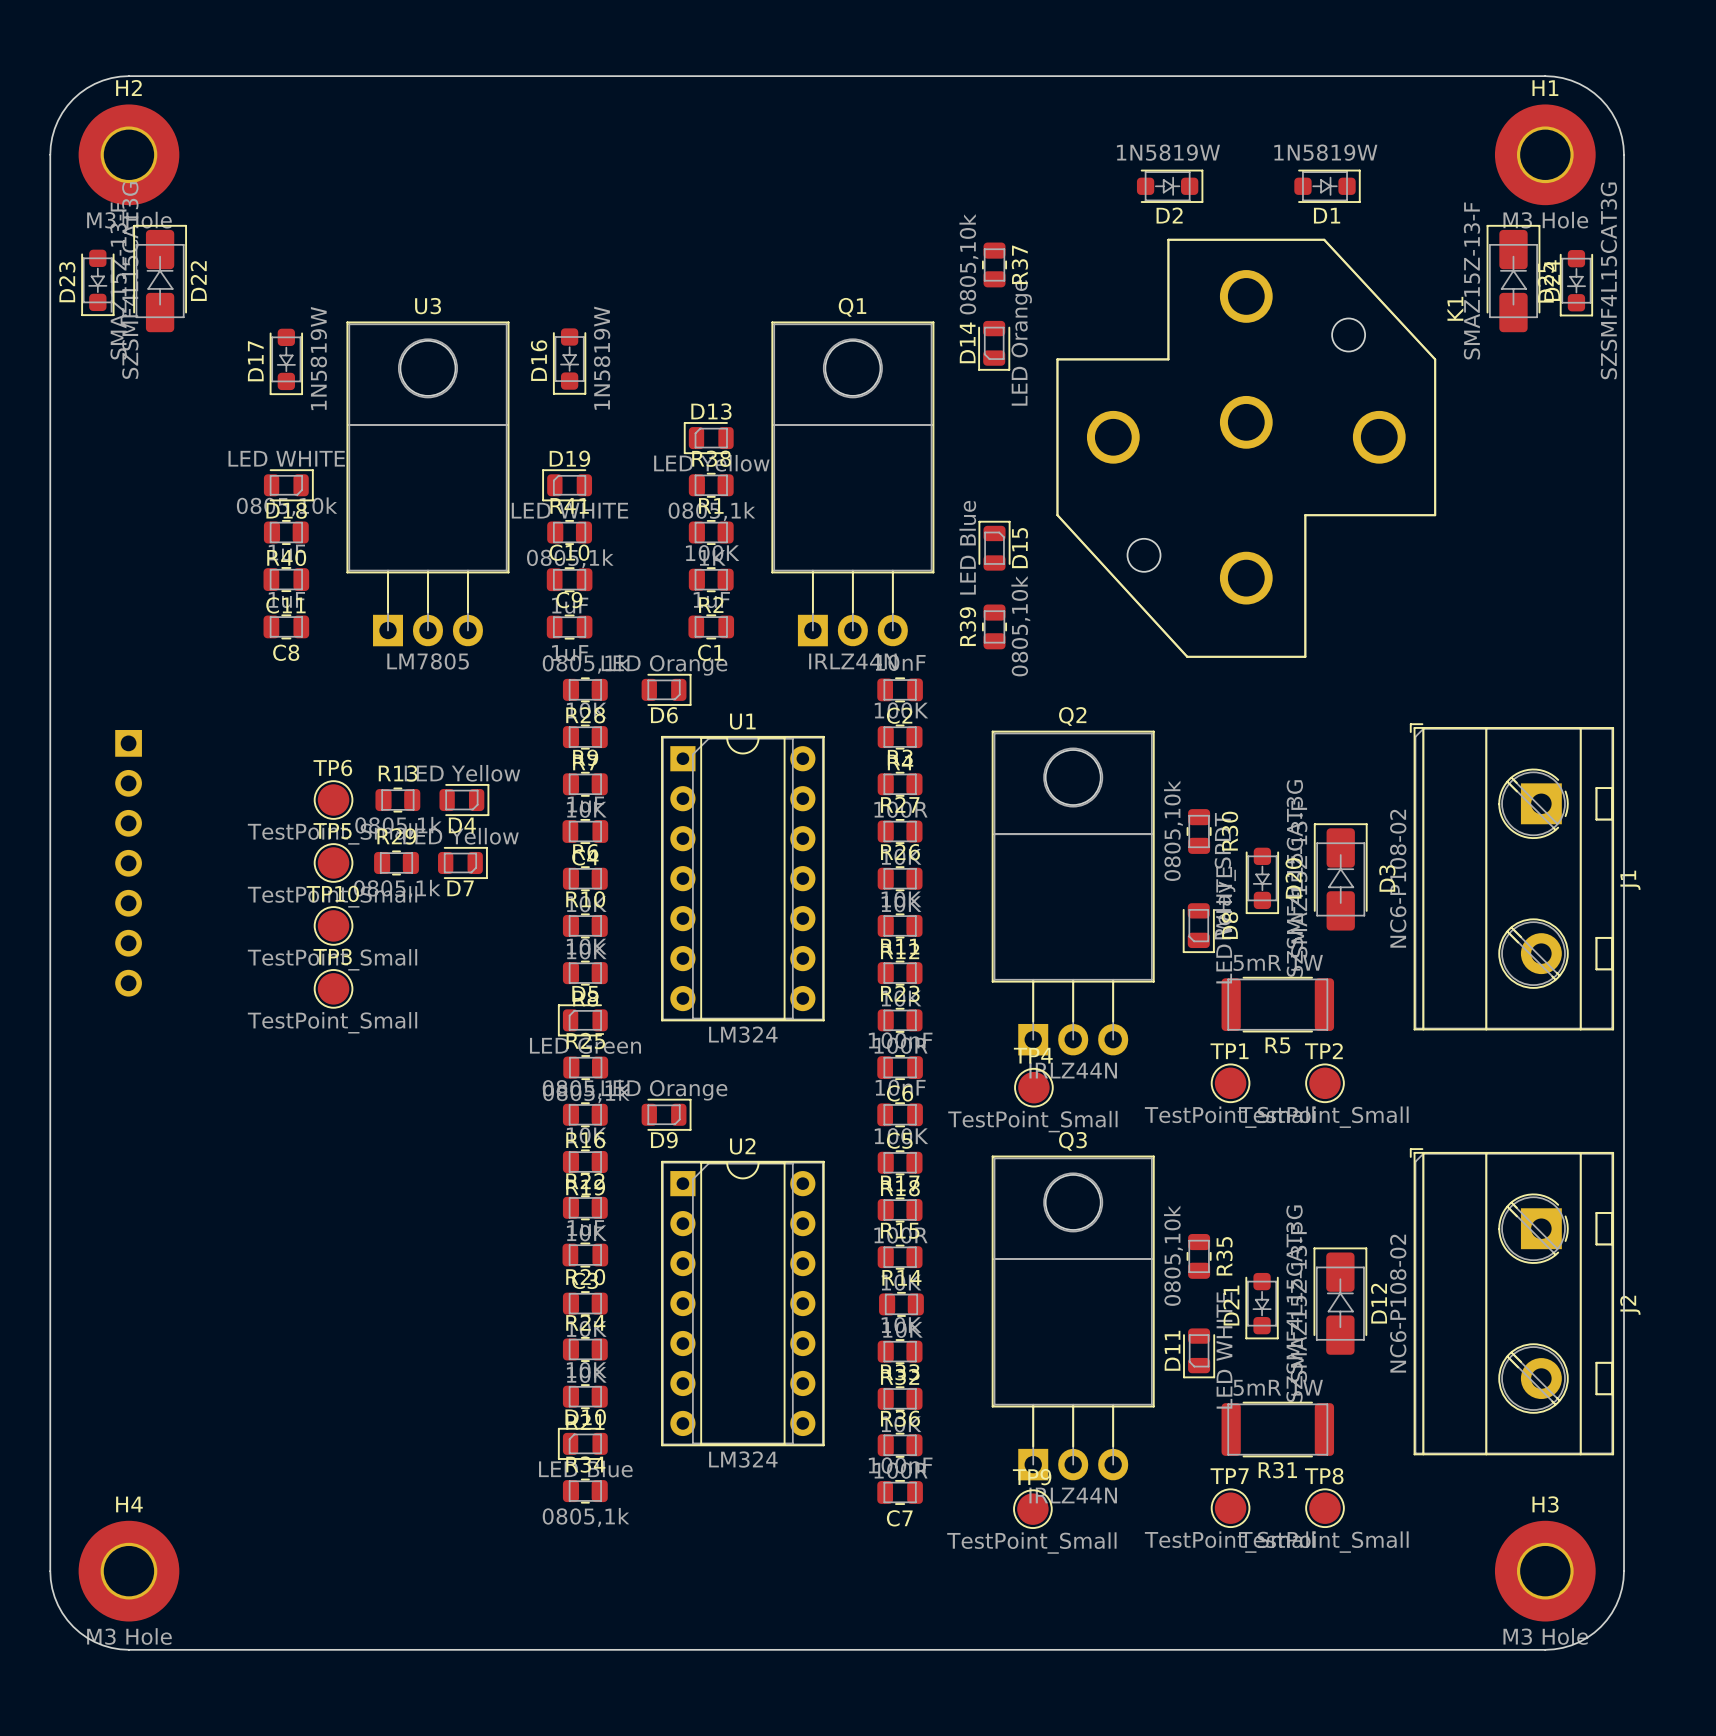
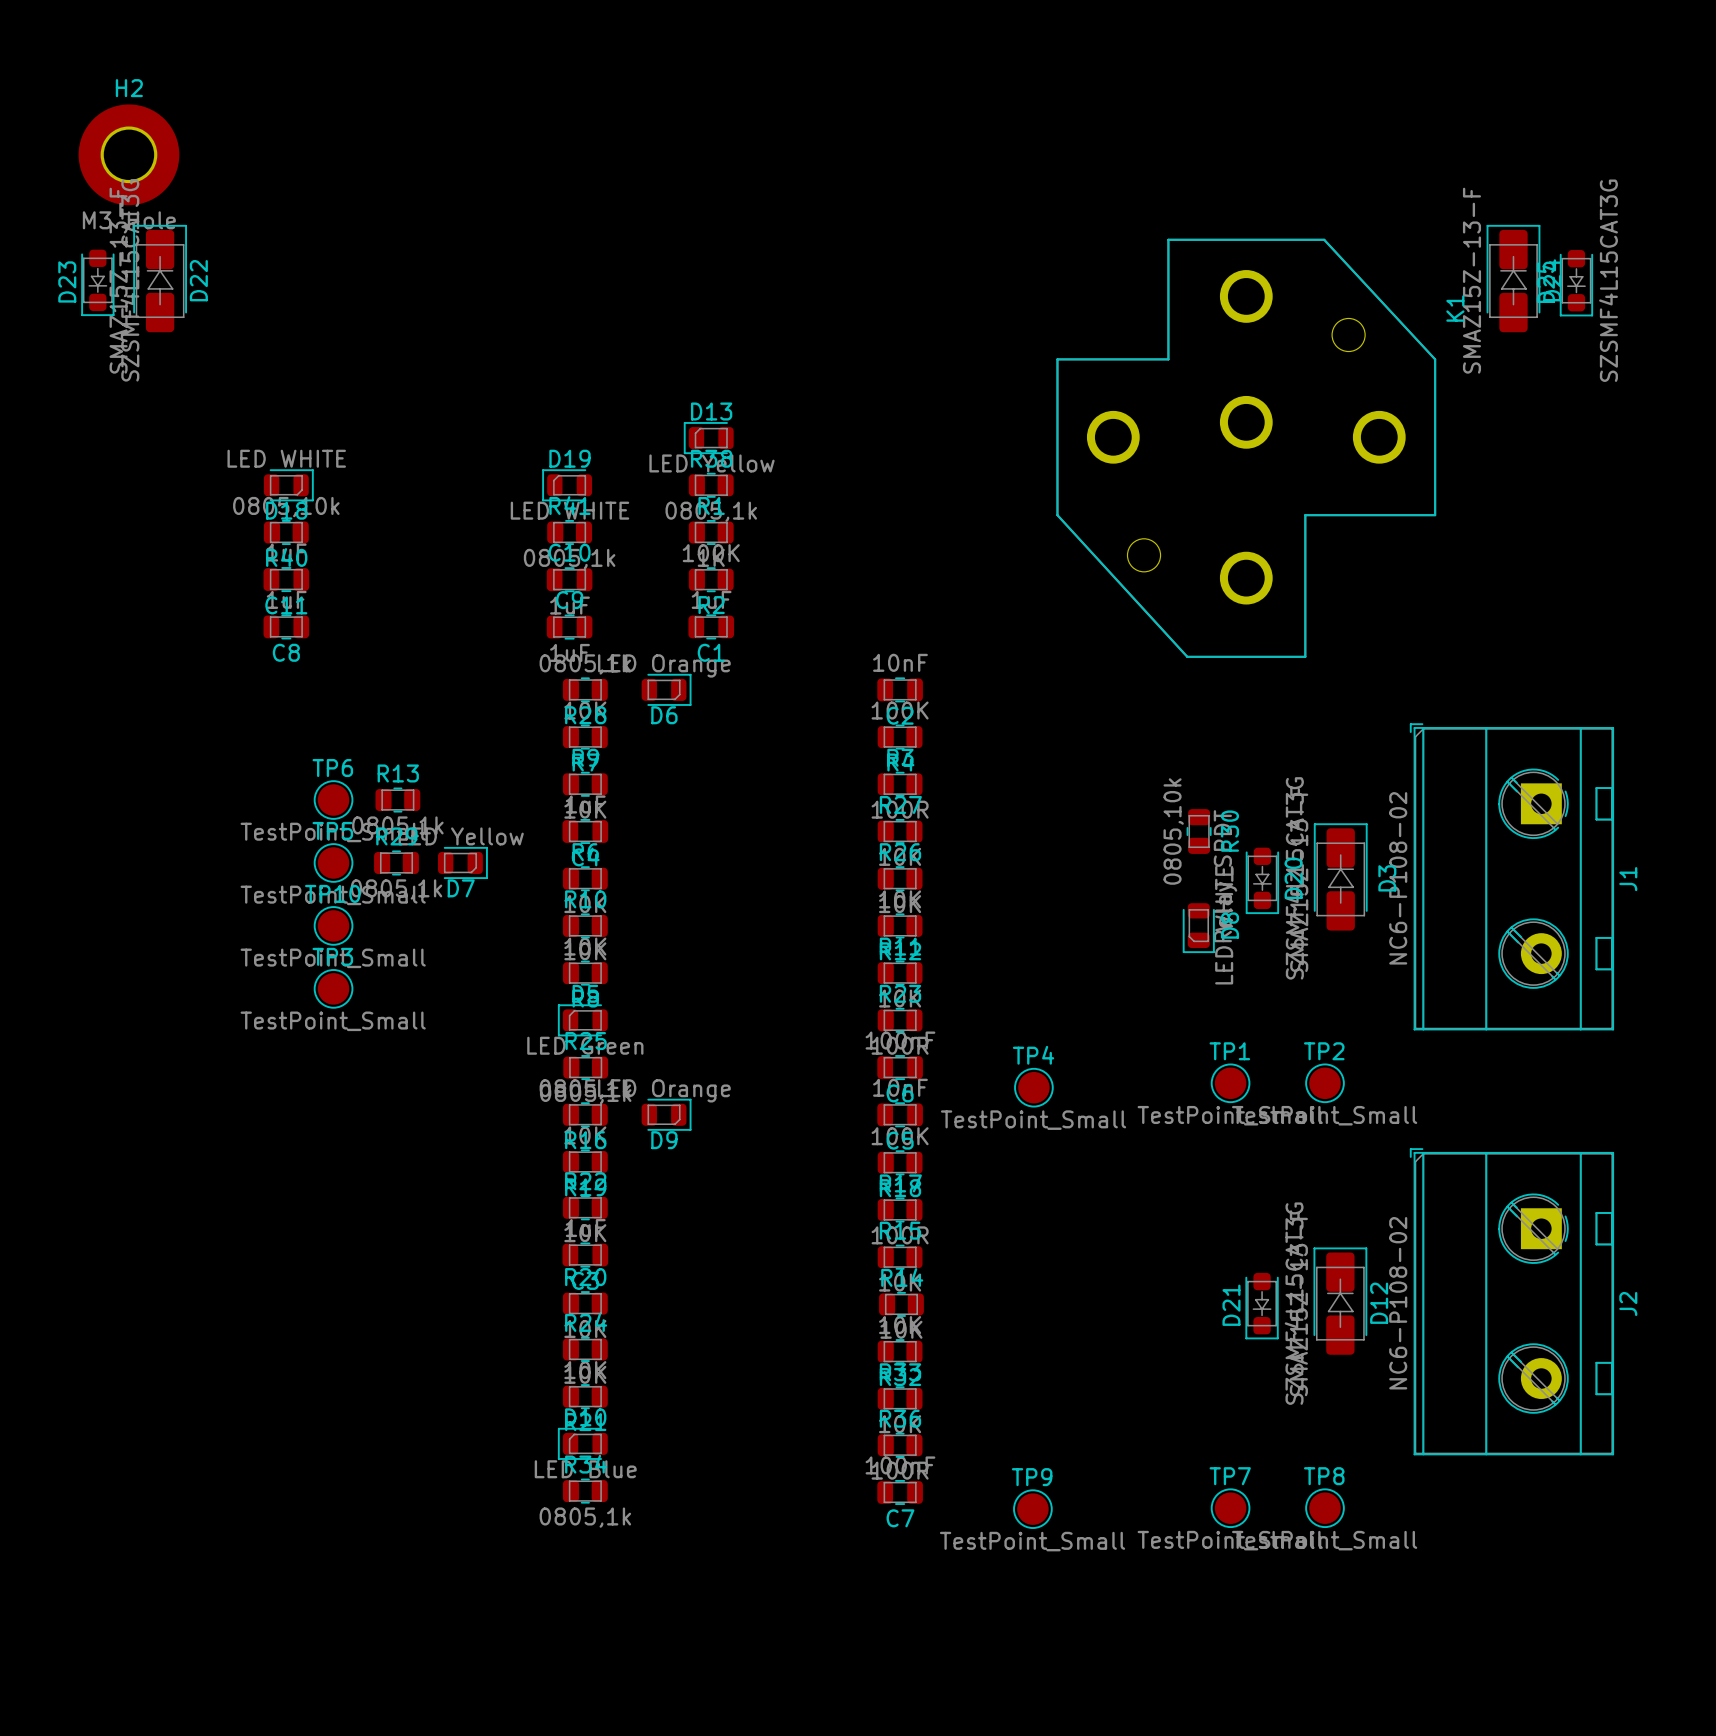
board edge: (128, 76) (1545, 76) (1562, 78) (1579, 83) (1600, 99) (1611, 112) (1619, 128) (1624, 154) (1624, 1571) (1619, 1597) (1611, 1613) (1600, 1626) (1587, 1637) (1571, 1645) (1545, 1649) (128, 1649) (102, 1645) (87, 1637) (73, 1626) (62, 1613) (54, 1597) (50, 1571) (50, 154) (52, 137) (58, 120) (73, 99) (87, 88) (102, 80) (128, 76) -> none
H1: M3 Hole (1545, 154) -> none
D2: 1N5819W (1170, 186) -> none
D1: 1N5819W (1327, 186) -> none
R37: 0805,10k (994, 264) -> none
D14: LED Orange (994, 345) -> none
D17: 1N5819W (286, 361) -> none
D16: 1N5819W (569, 361) -> none
U3: LM7805 (427, 483) -> none
Q1: IRLZ44N (852, 483) -> none
D15: LED Blue (994, 545) -> none
R39: 0805,10k (994, 626) -> none
D4: LED Yellow (464, 800) -> none
part: (128, 863) -> none
U1: LM324 (742, 878) -> none
Q2: IRLZ44N (1073, 893) -> none
R5: 5mR 1W (1277, 1004) -> none
R35: 0805,10k (1199, 1256) -> none
U2: LM324 (742, 1303) -> none
Q3: IRLZ44N (1073, 1317) -> none
D11: LED WHITE (1199, 1353) -> none
R31: 5mR 1W (1277, 1429) -> none
H4: M3 Hole (128, 1571) -> none
H3: M3 Hole (1545, 1571) -> none

